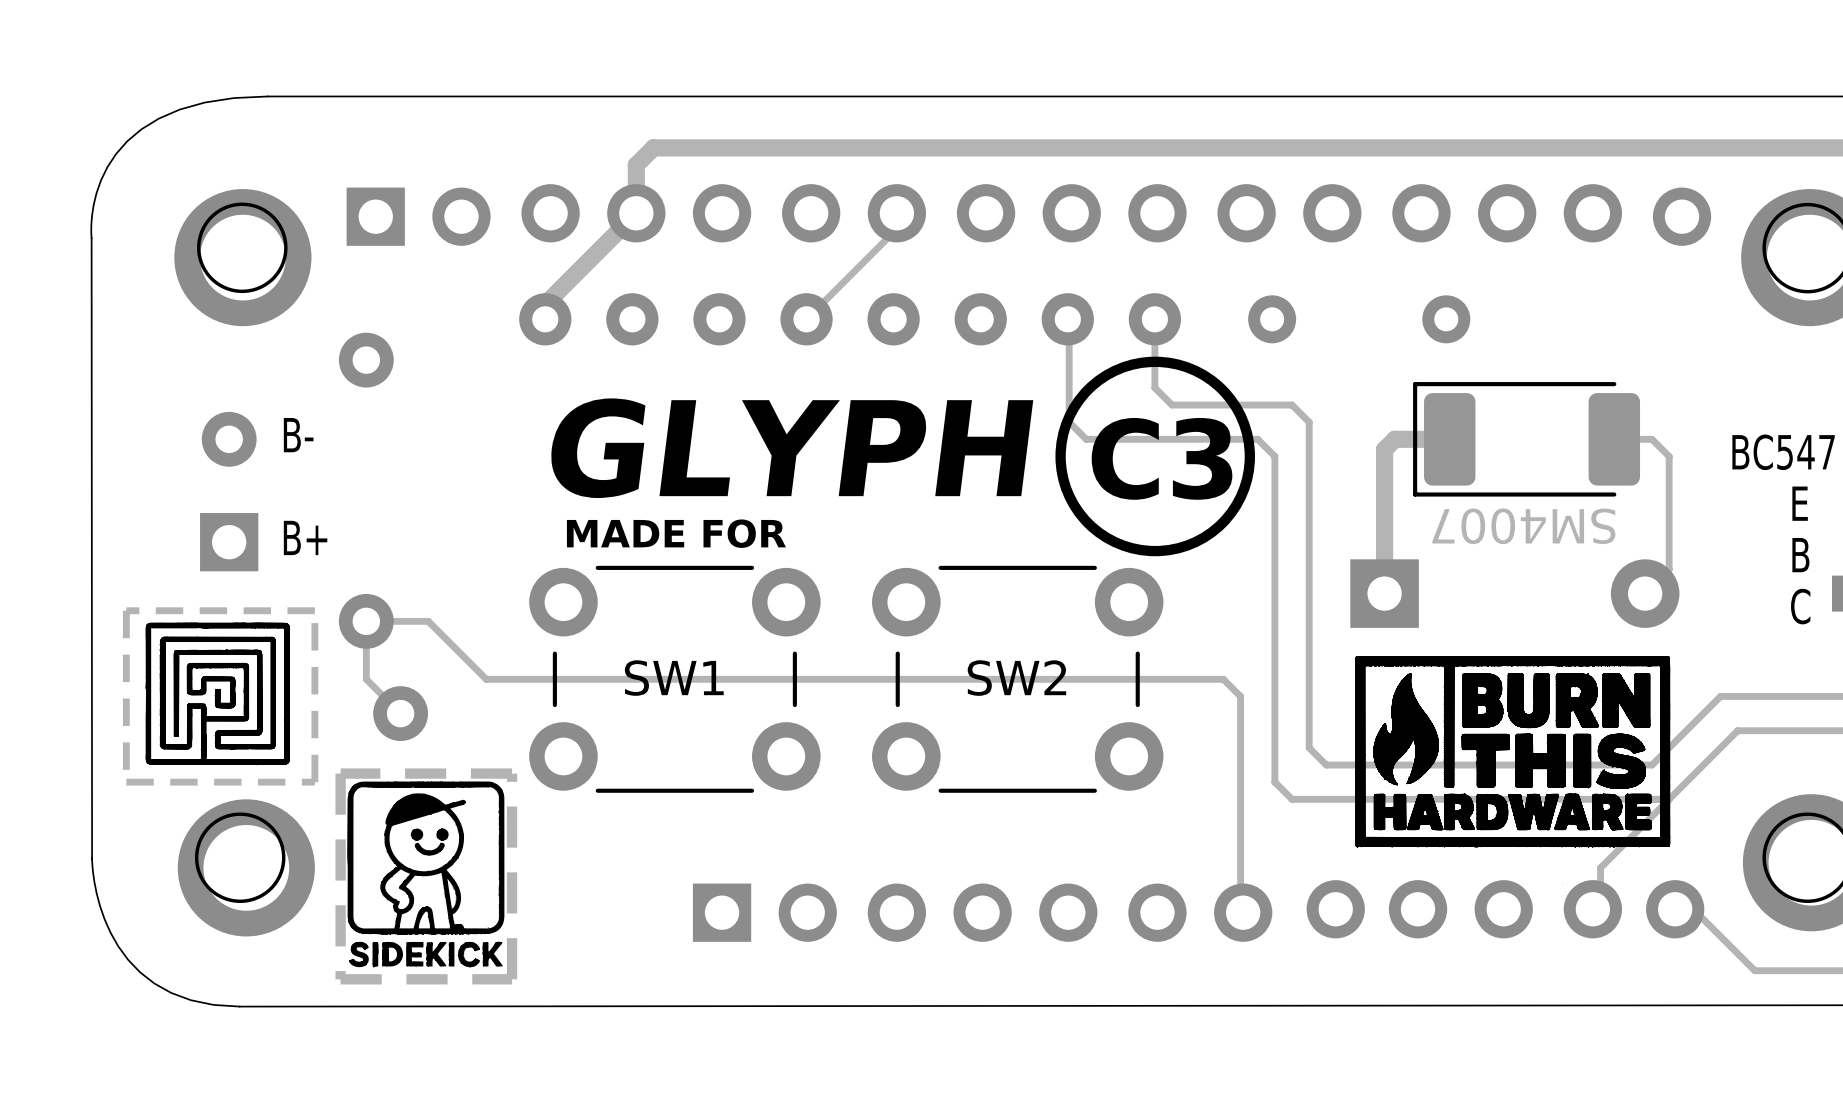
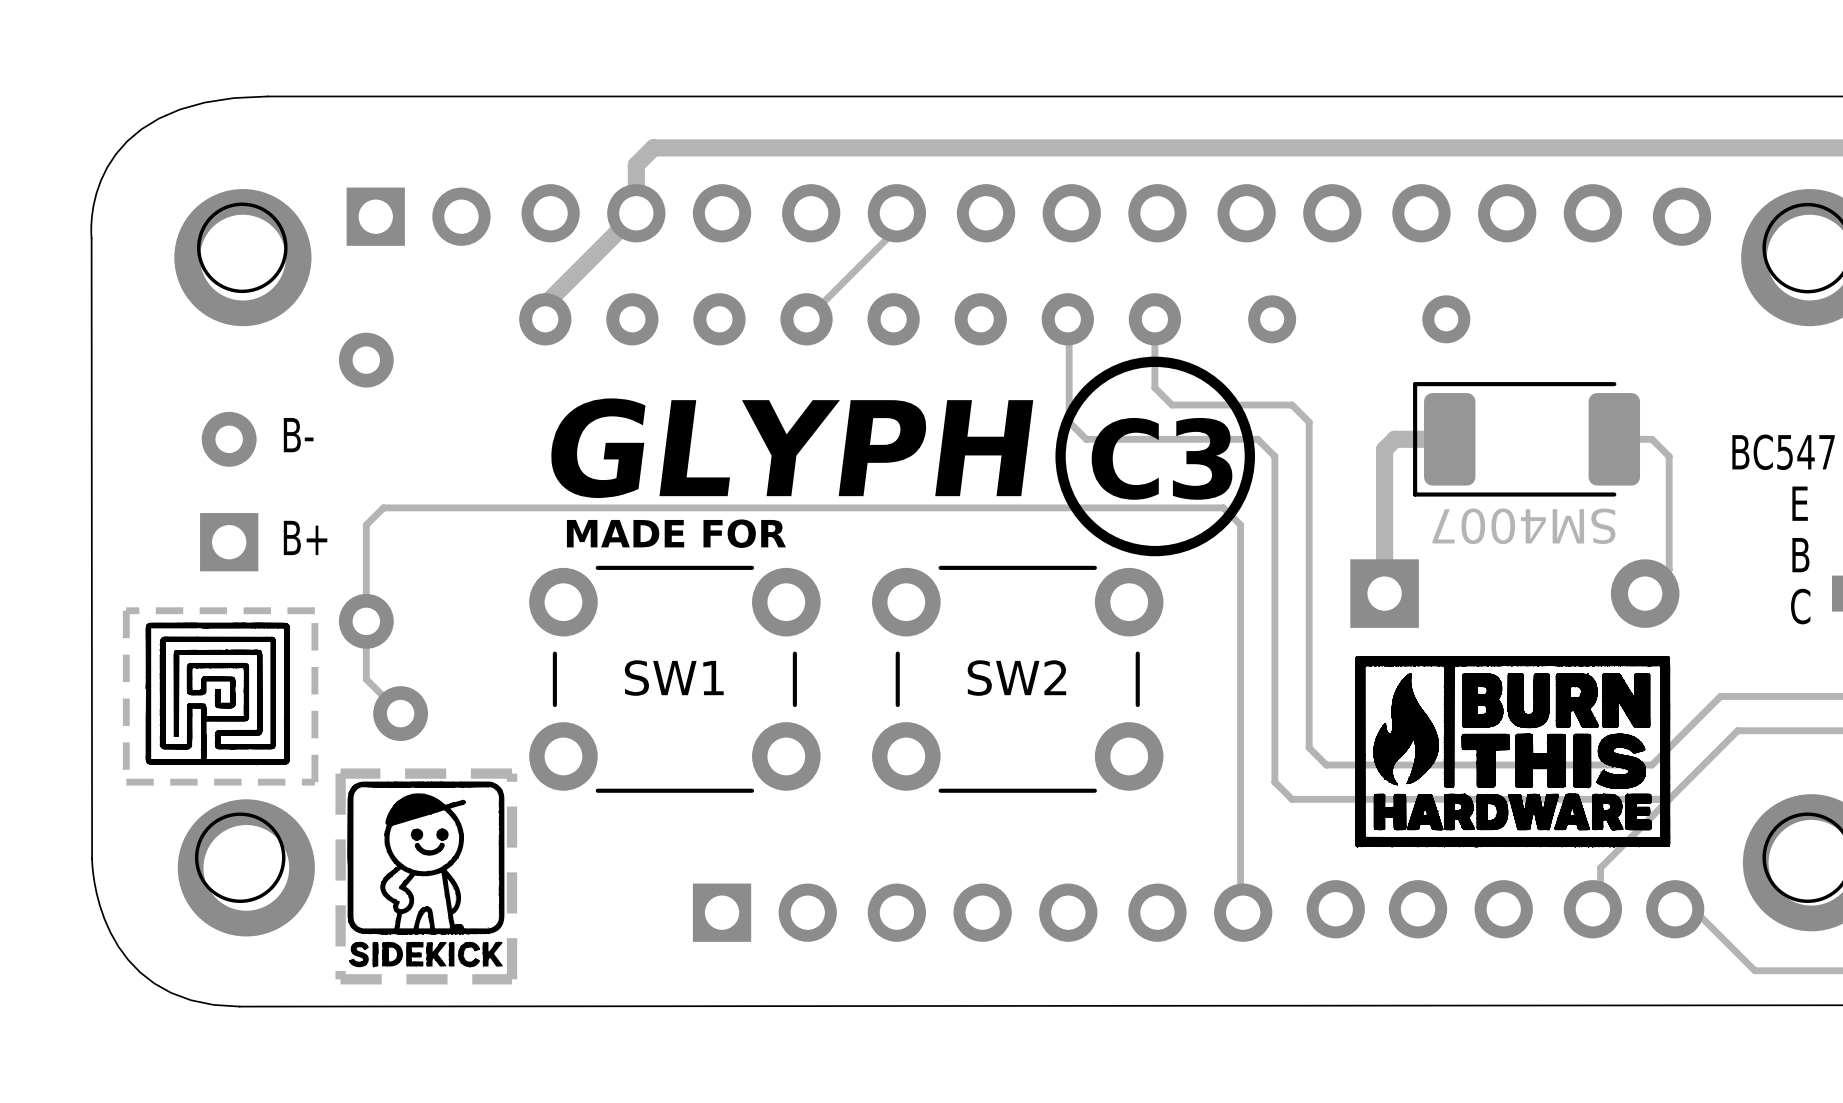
track: (366, 621) (428, 621) (486, 679) (1223, 679) (1240, 696) -> (366, 621) (366, 525) (383, 507) (1223, 507) (1240, 525) (1240, 696)

